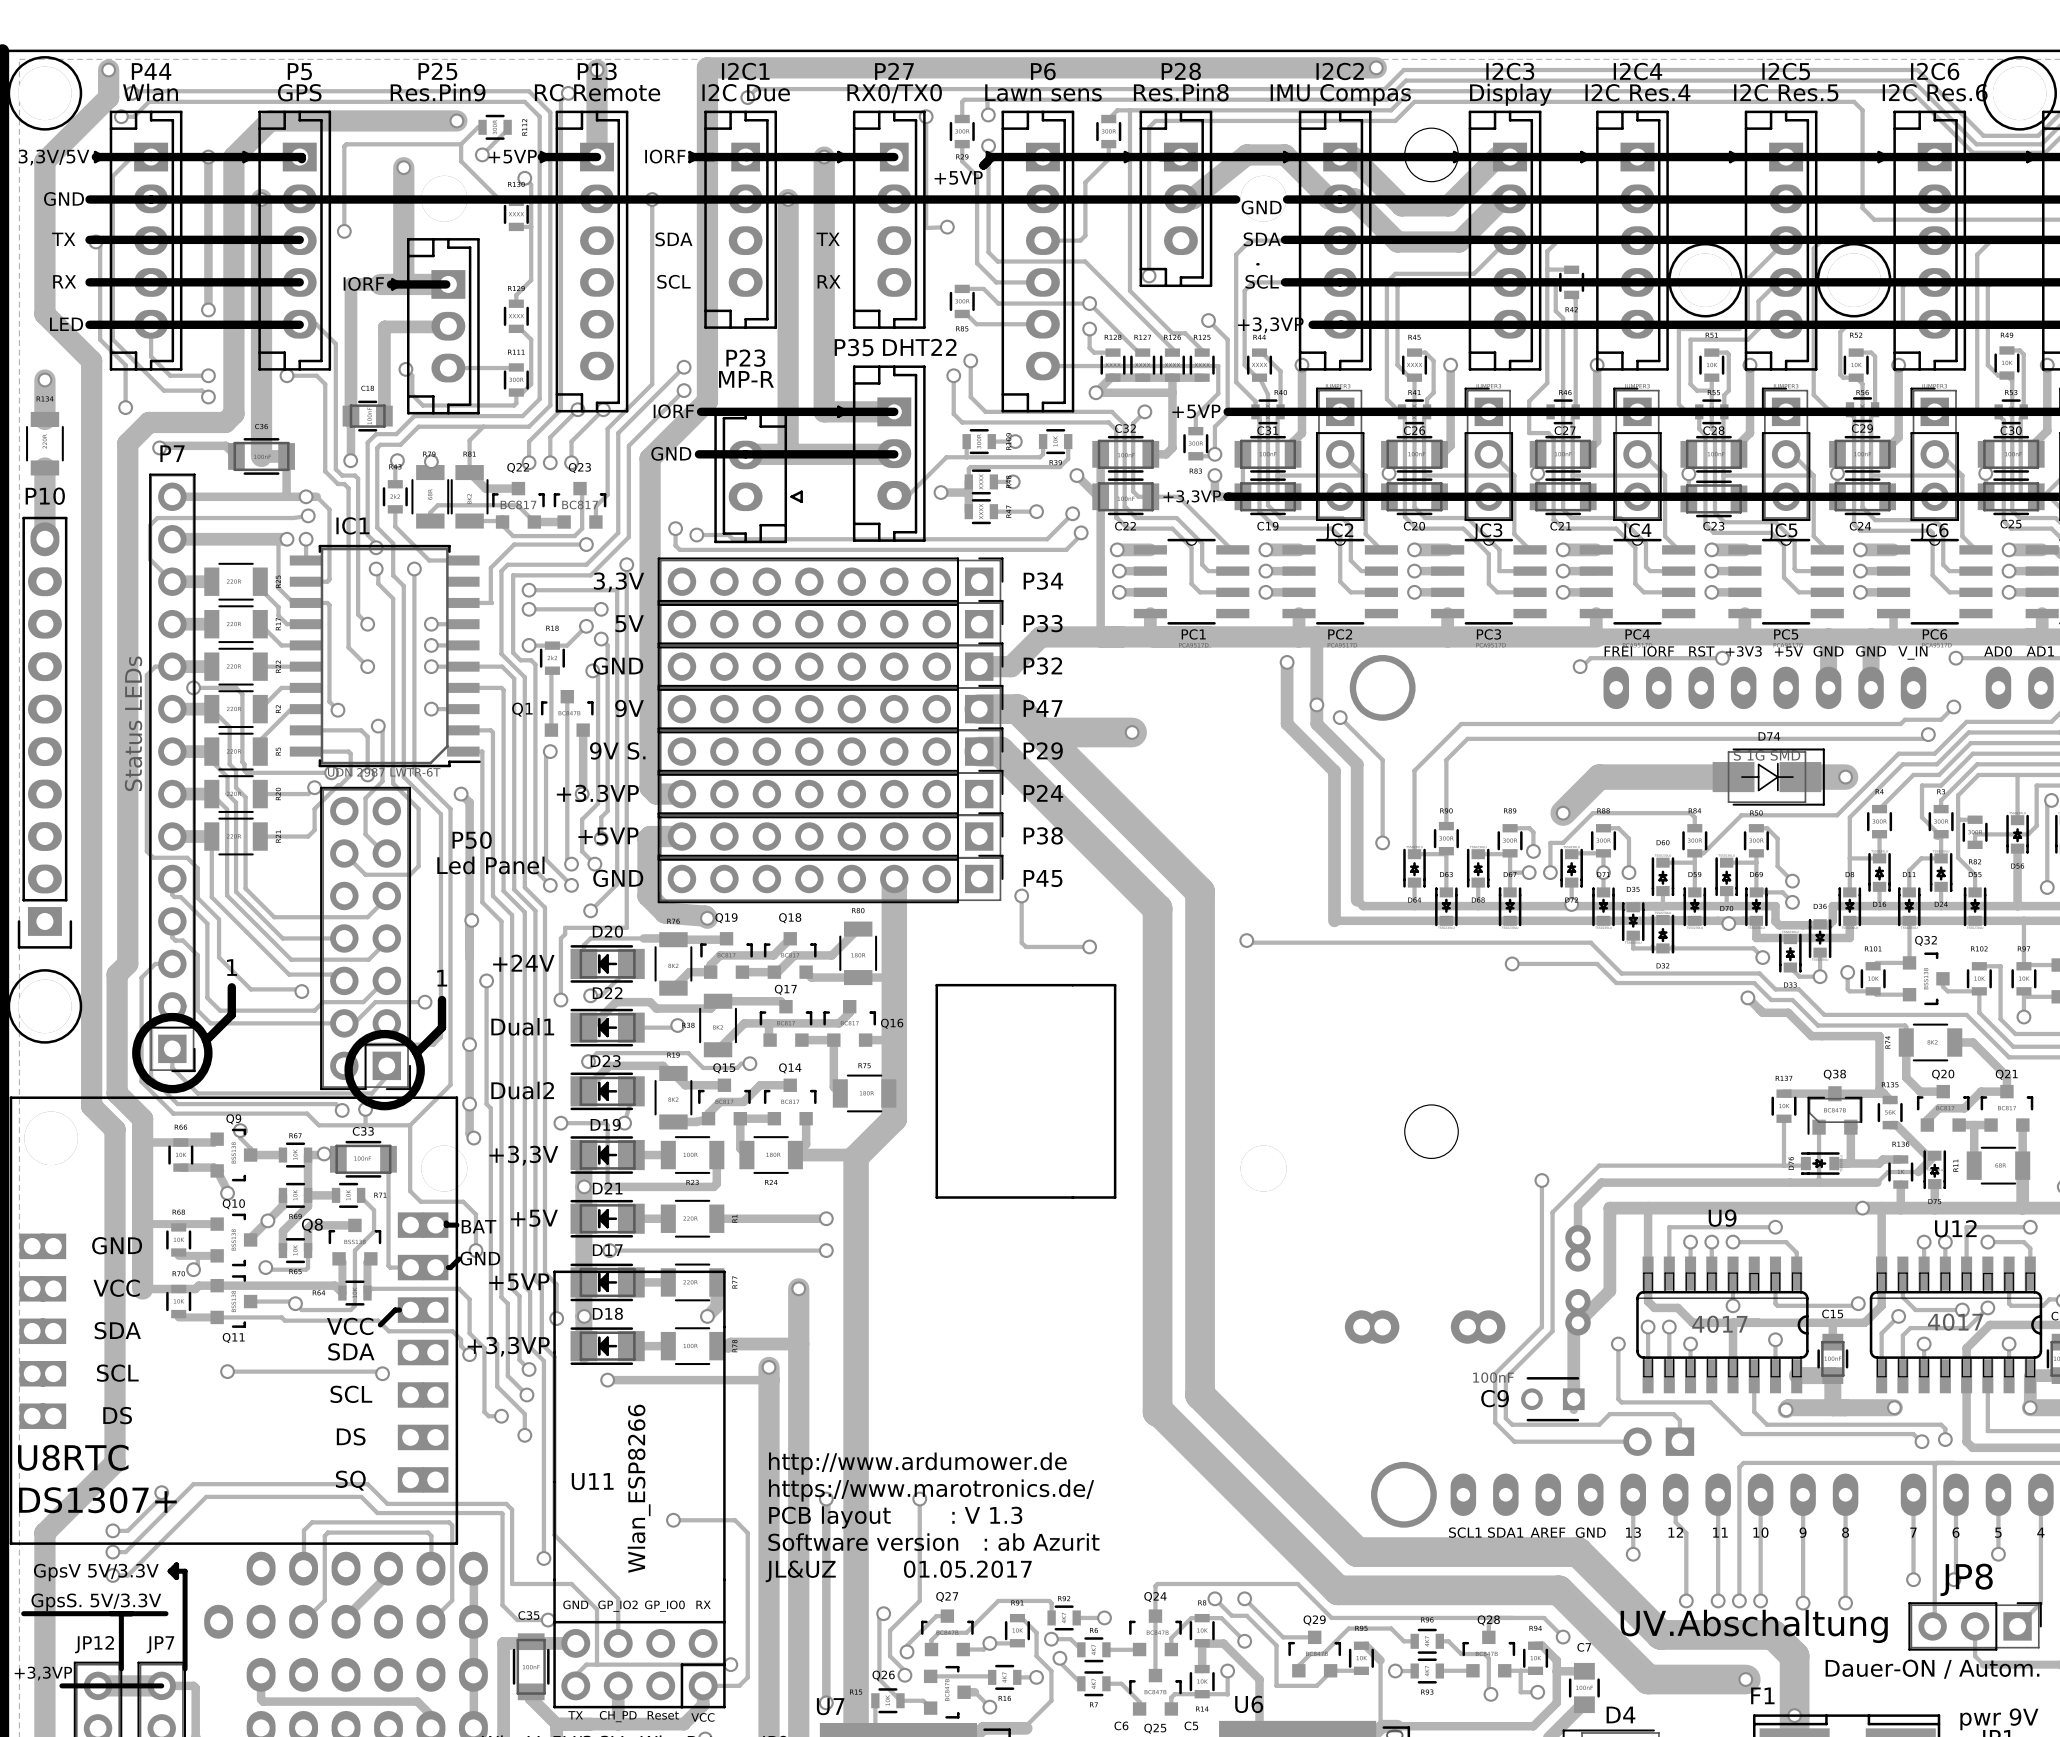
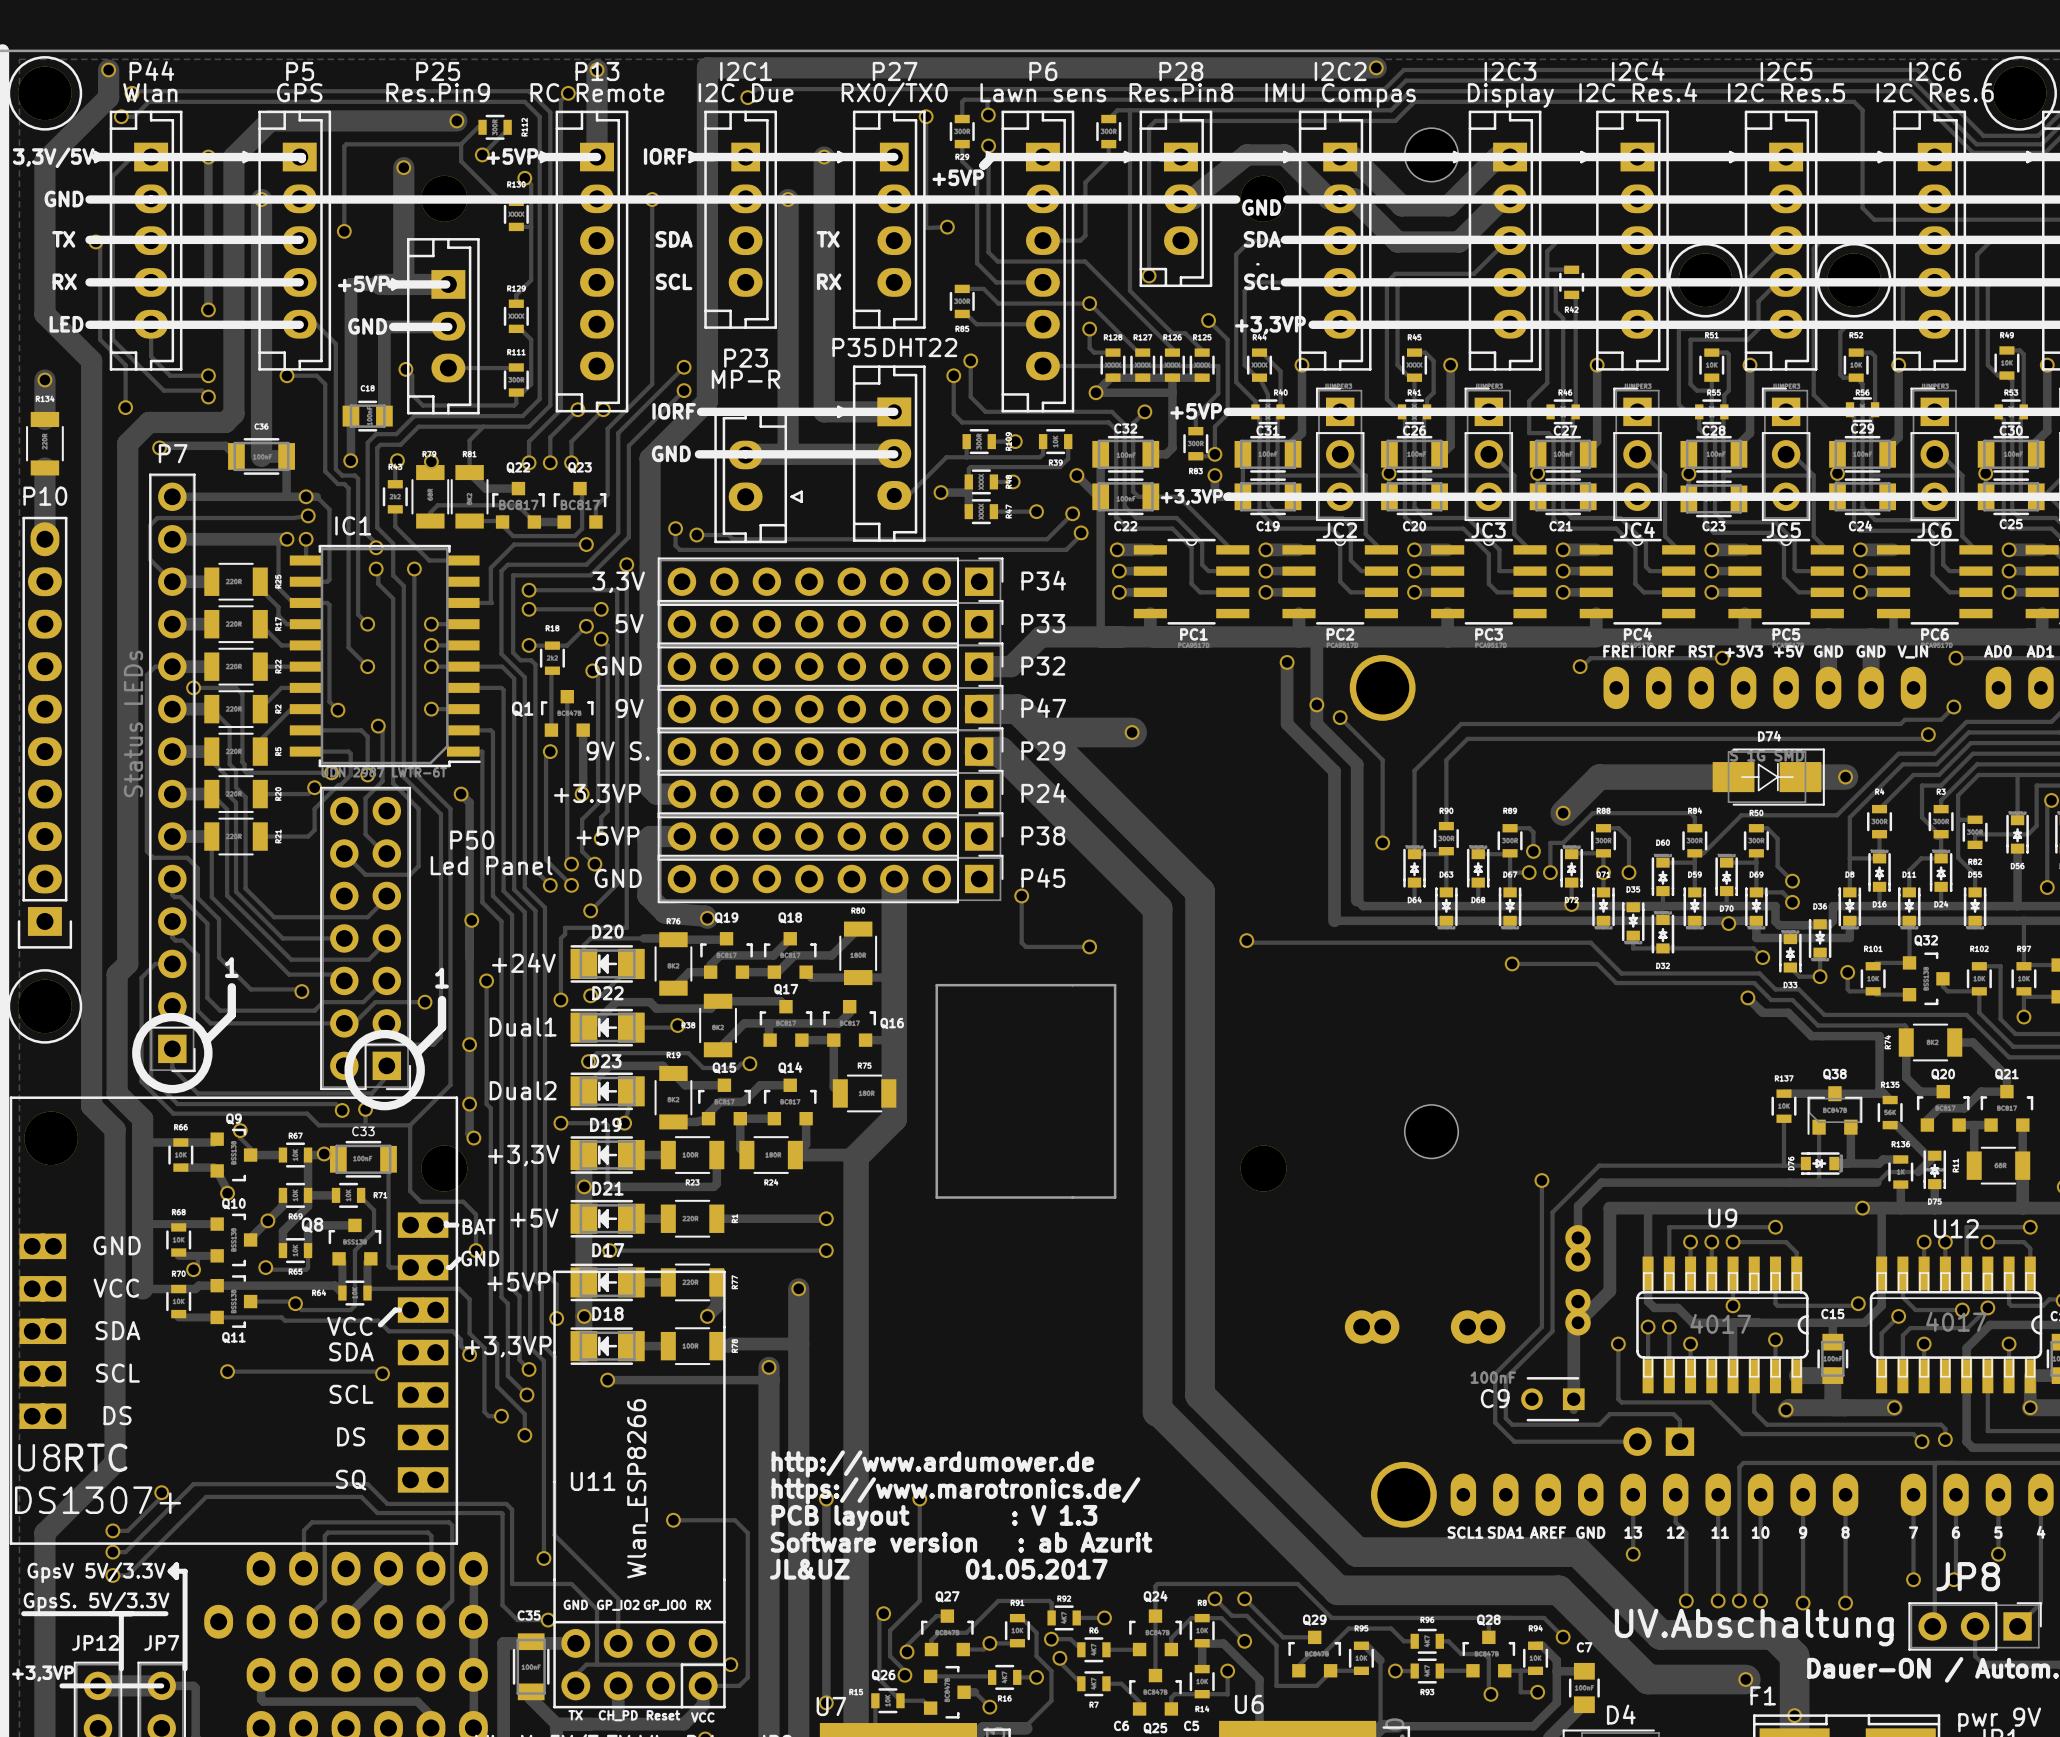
text: IORF (363, 283) -> +5VP (363, 283)
text: none -> GND (367, 326)
line: none -> (393, 326) (448, 326)

